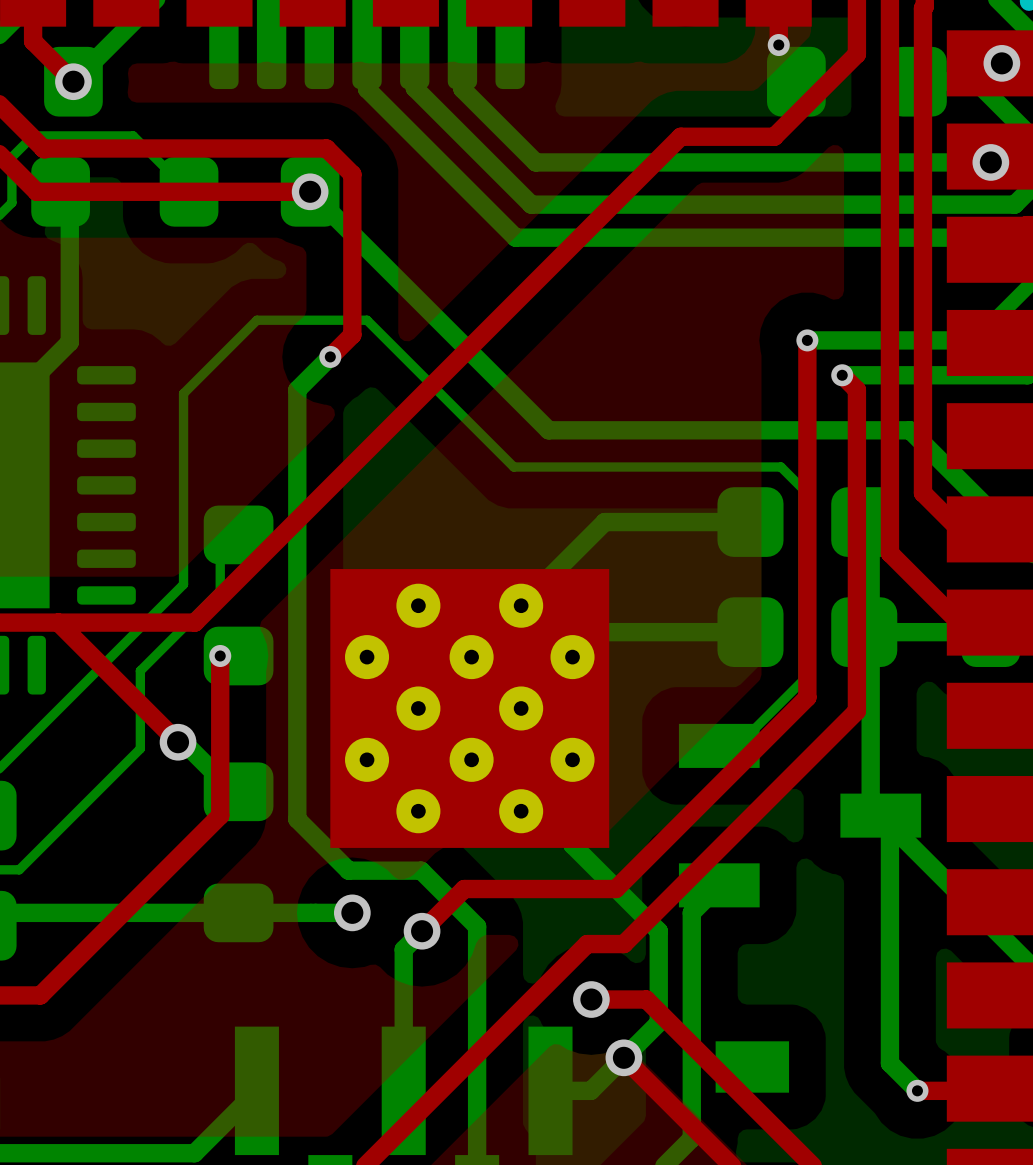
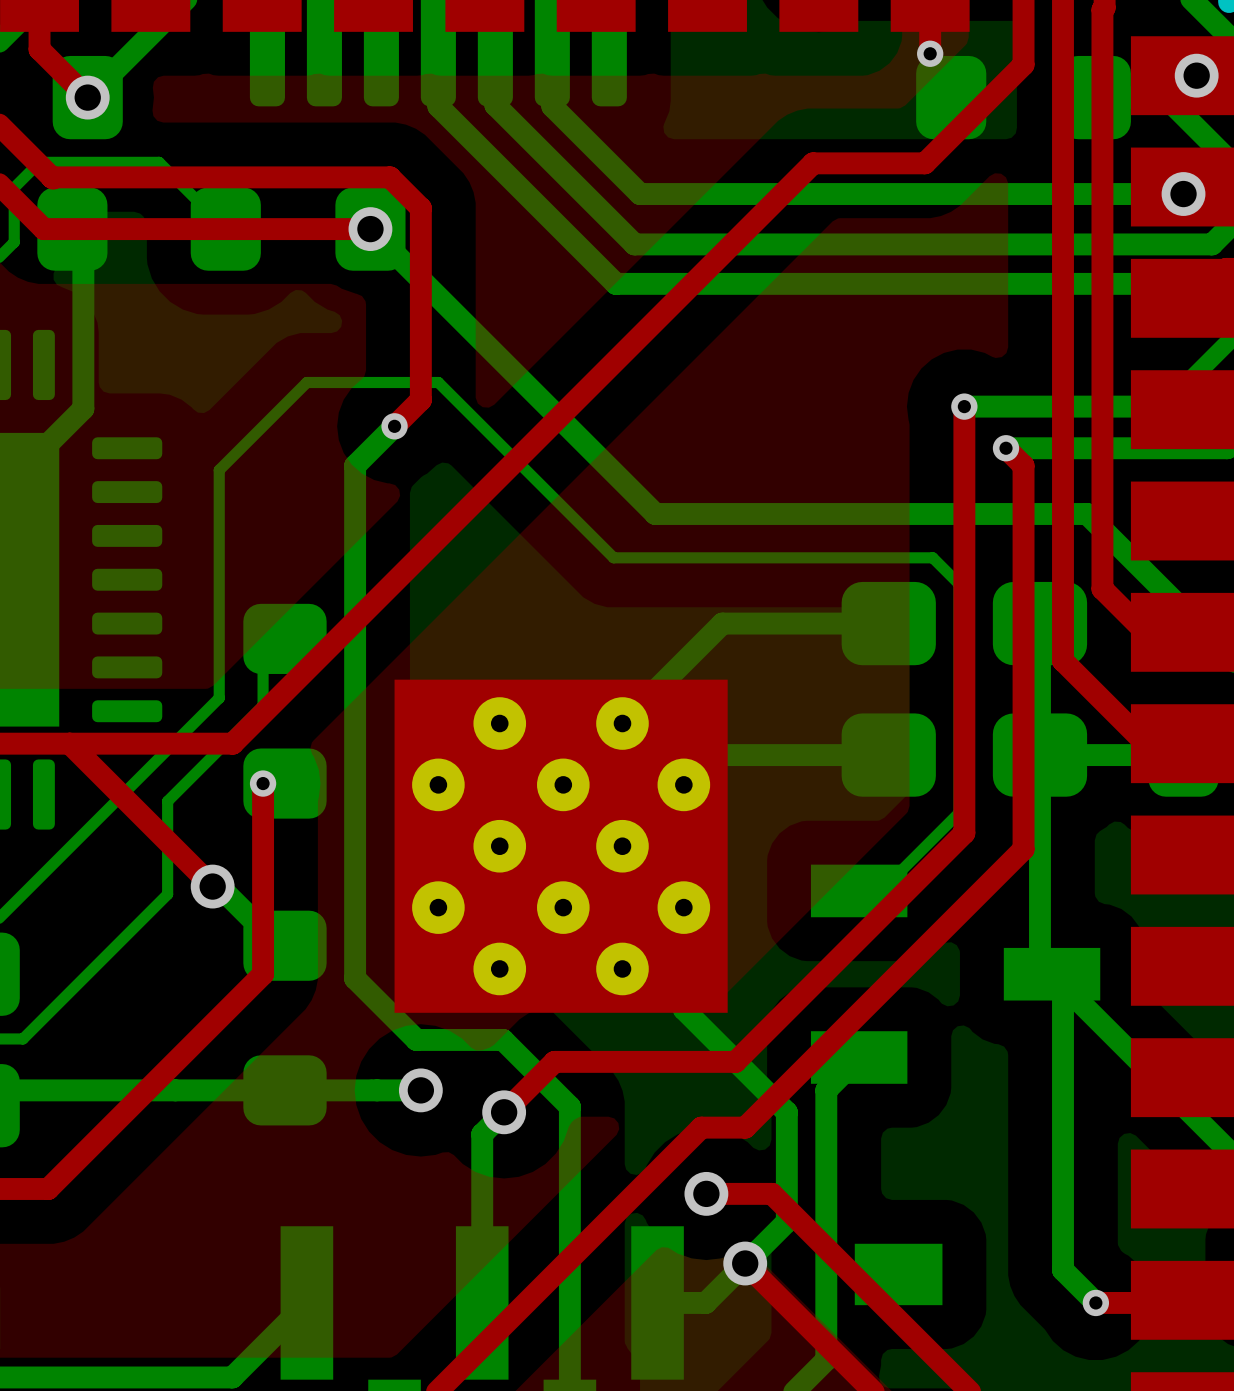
part footprint: [717, 487, 898, 557] -> [841, 581, 1088, 666]
part footprint: [717, 597, 898, 668] -> [841, 713, 1088, 797]

